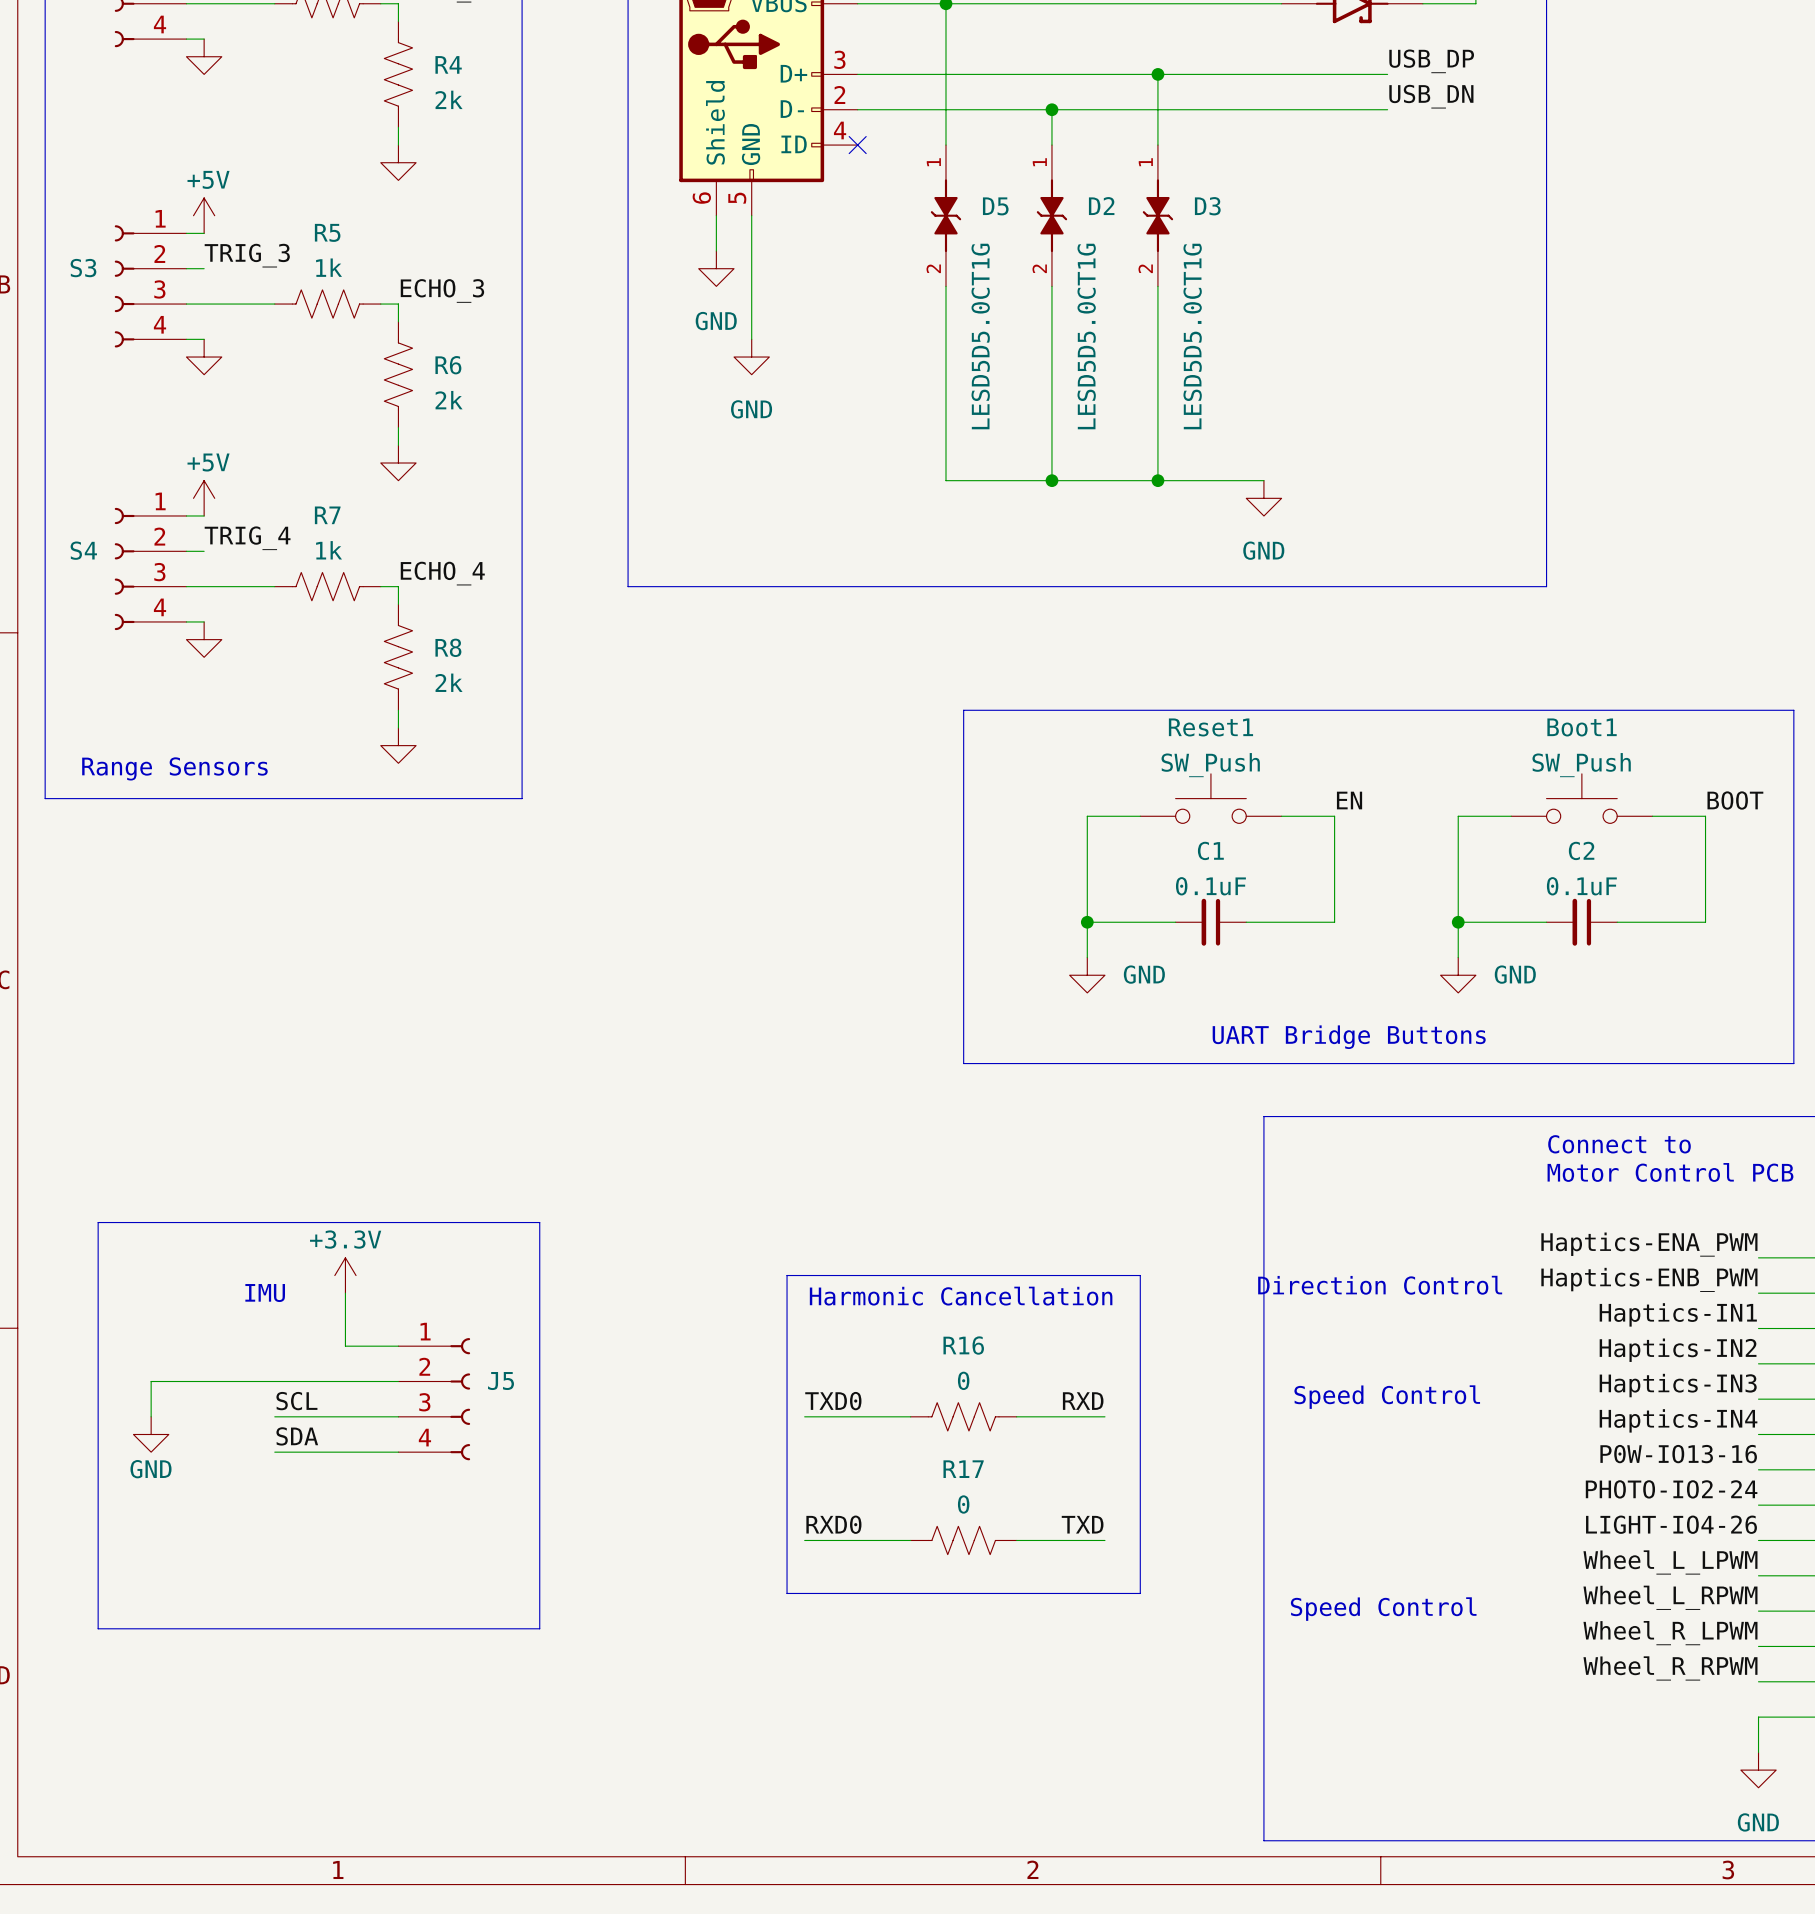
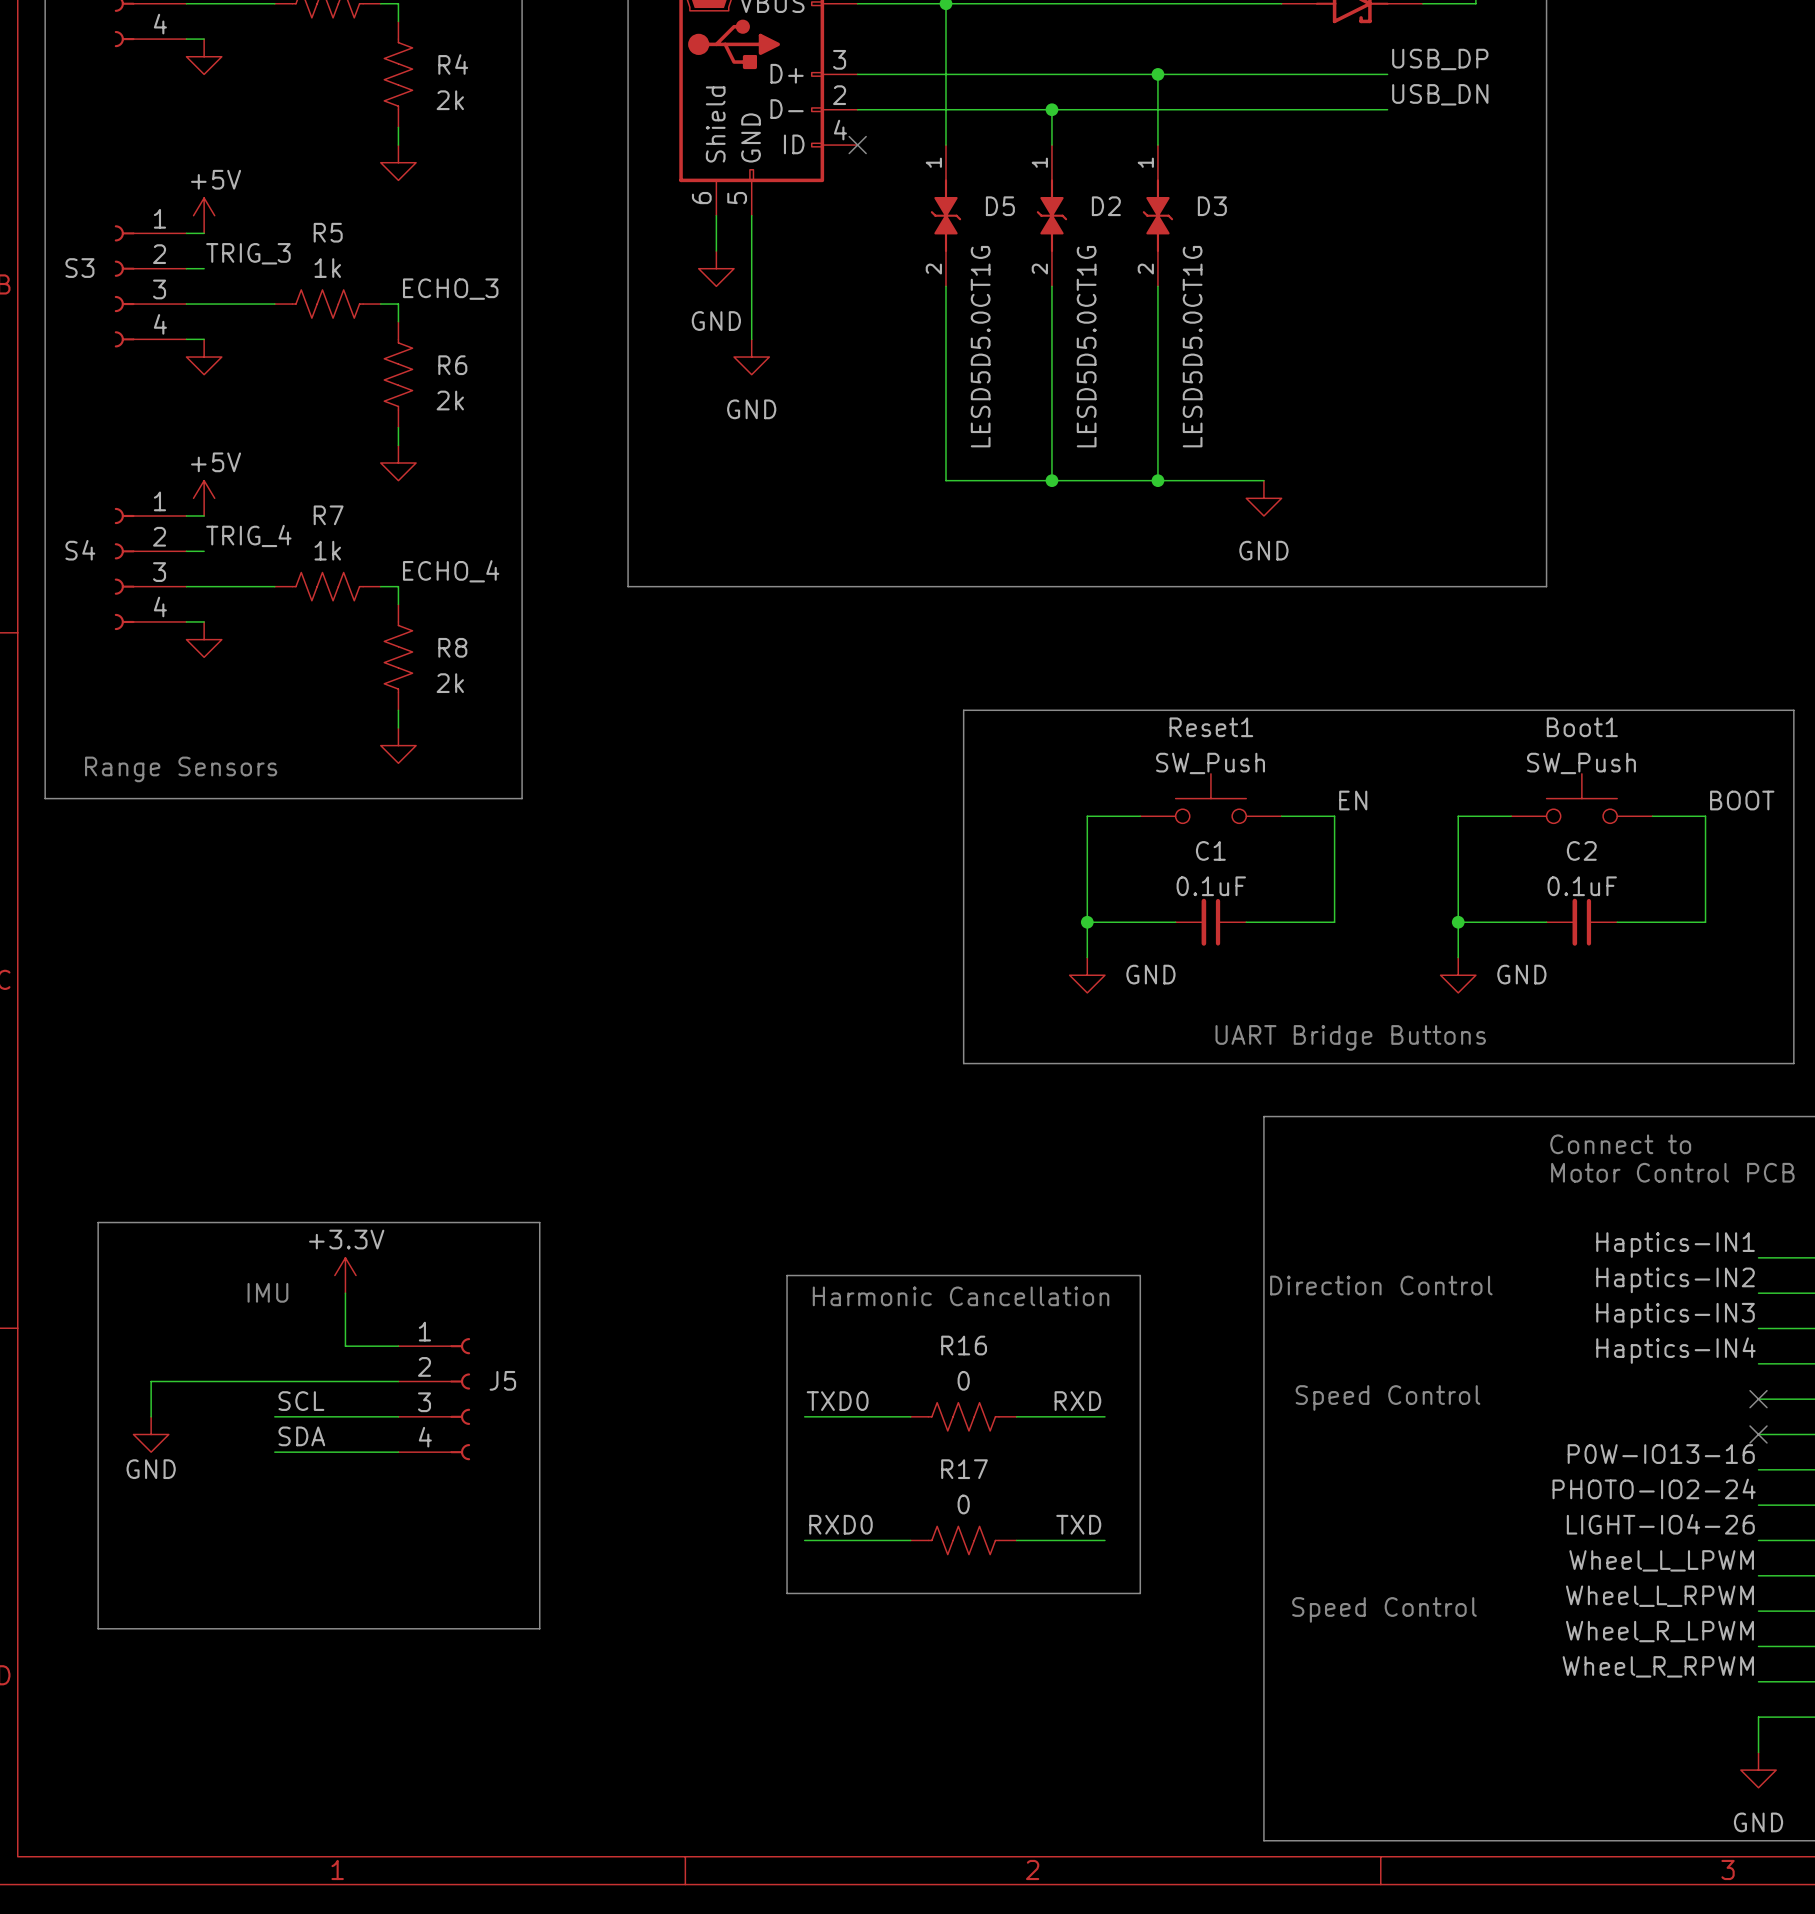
label: Haptics-ENA_PWM (1649, 1244) -> Haptics-IN1 (1675, 1245)
label: Haptics-ENB_PWM (1649, 1279) -> Haptics-IN2 (1675, 1280)
label: Haptics-IN1 (1678, 1314) -> Haptics-IN3 (1675, 1315)
label: Haptics-IN2 (1678, 1350) -> Haptics-IN4 (1675, 1350)
label: Haptics-IN3 (1678, 1385) -> none
no-connect mark: none -> (1758, 1399)
label: Haptics-IN4 (1678, 1420) -> none
no-connect mark: none -> (1758, 1434)

